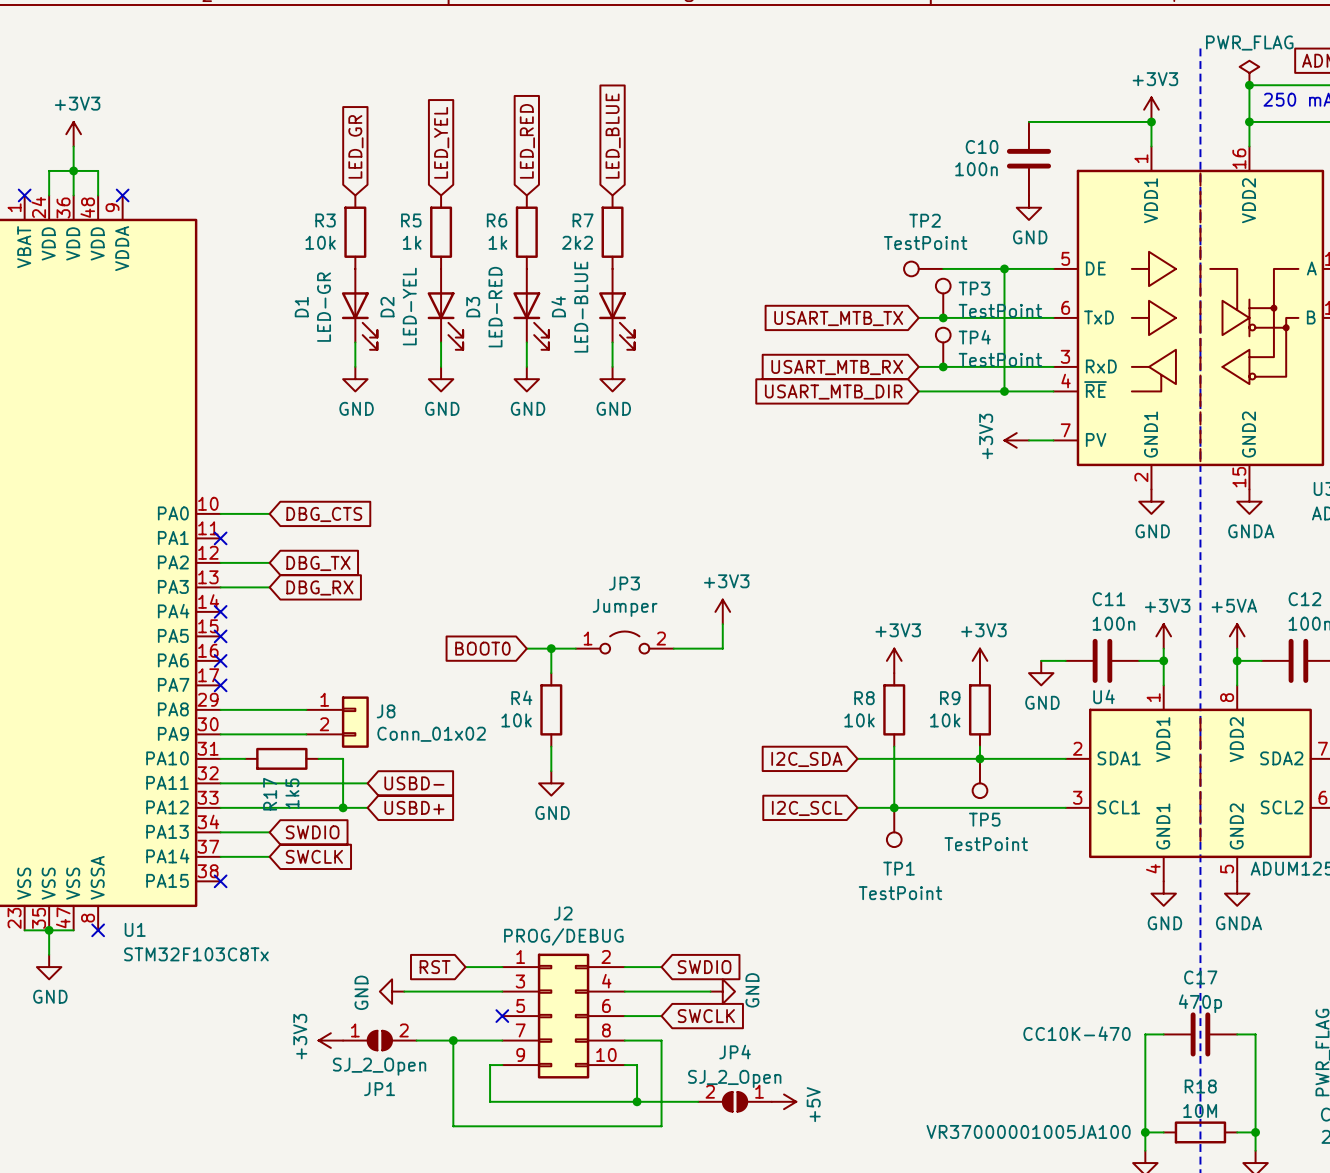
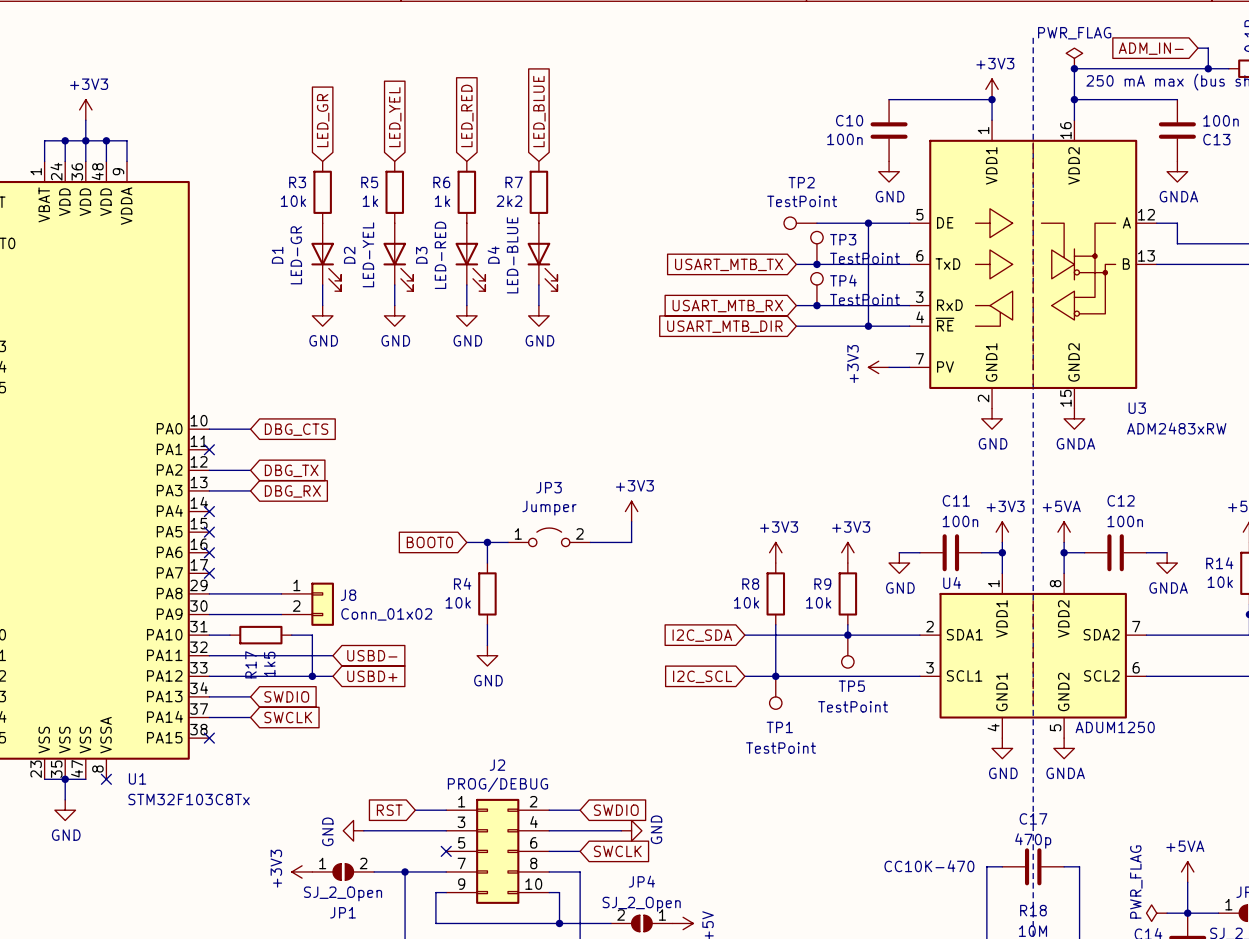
wire: none -> (65, 140) (44, 140) (44, 161)
junction: none -> (65, 140)
wire: none -> (106, 140) (126, 140) (126, 161)
junction: none -> (106, 140)
no-connect mark: (24, 195) -> none
no-connect mark: (122, 195) -> none

